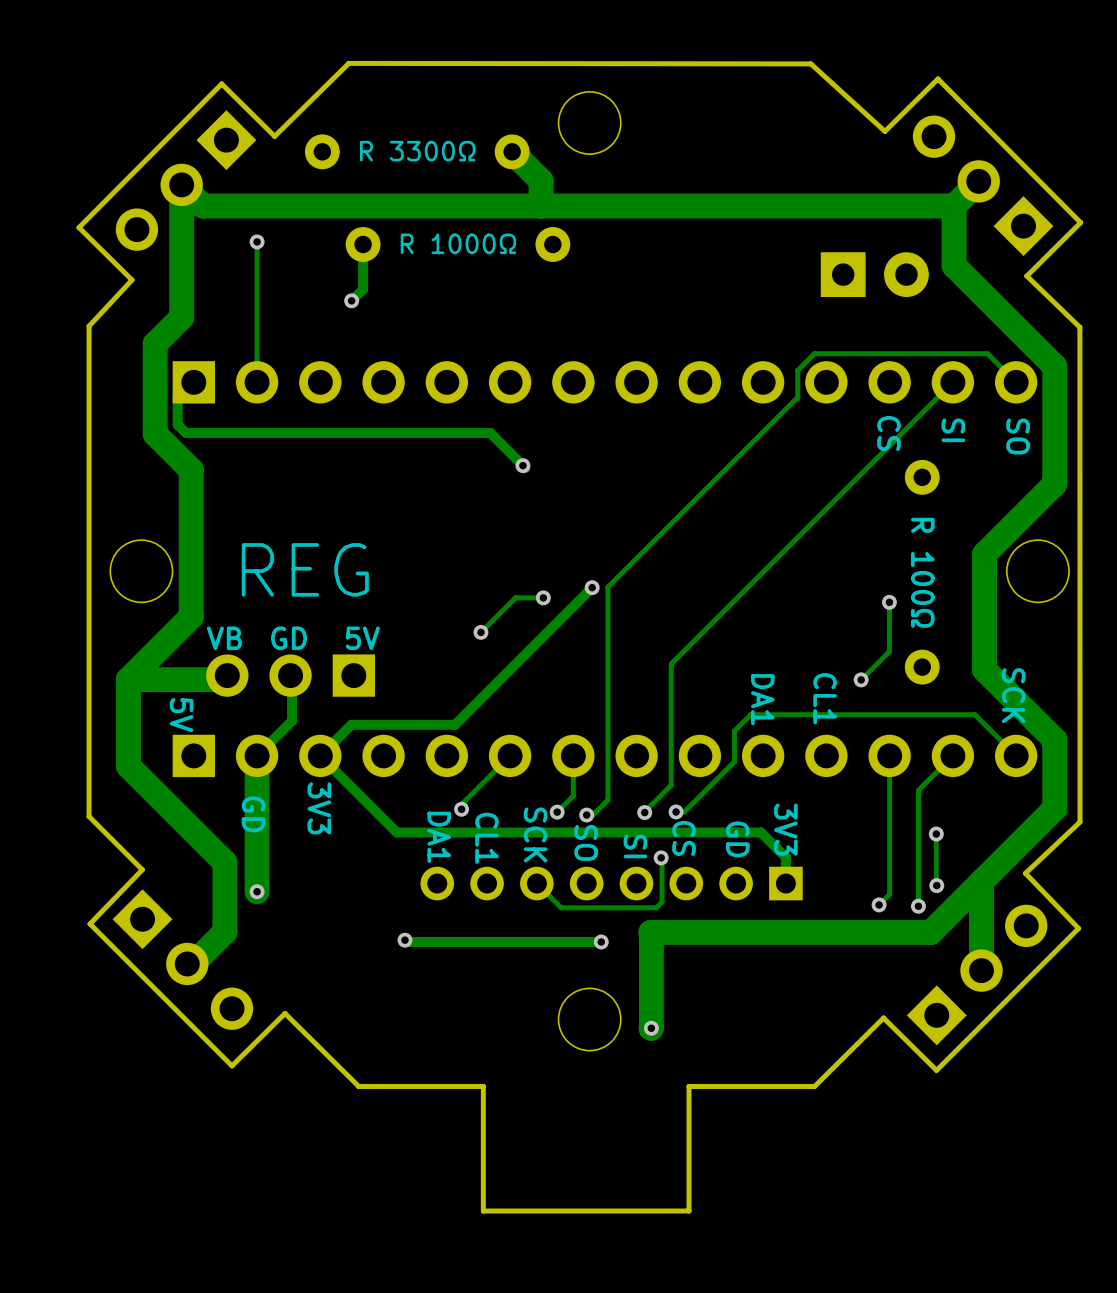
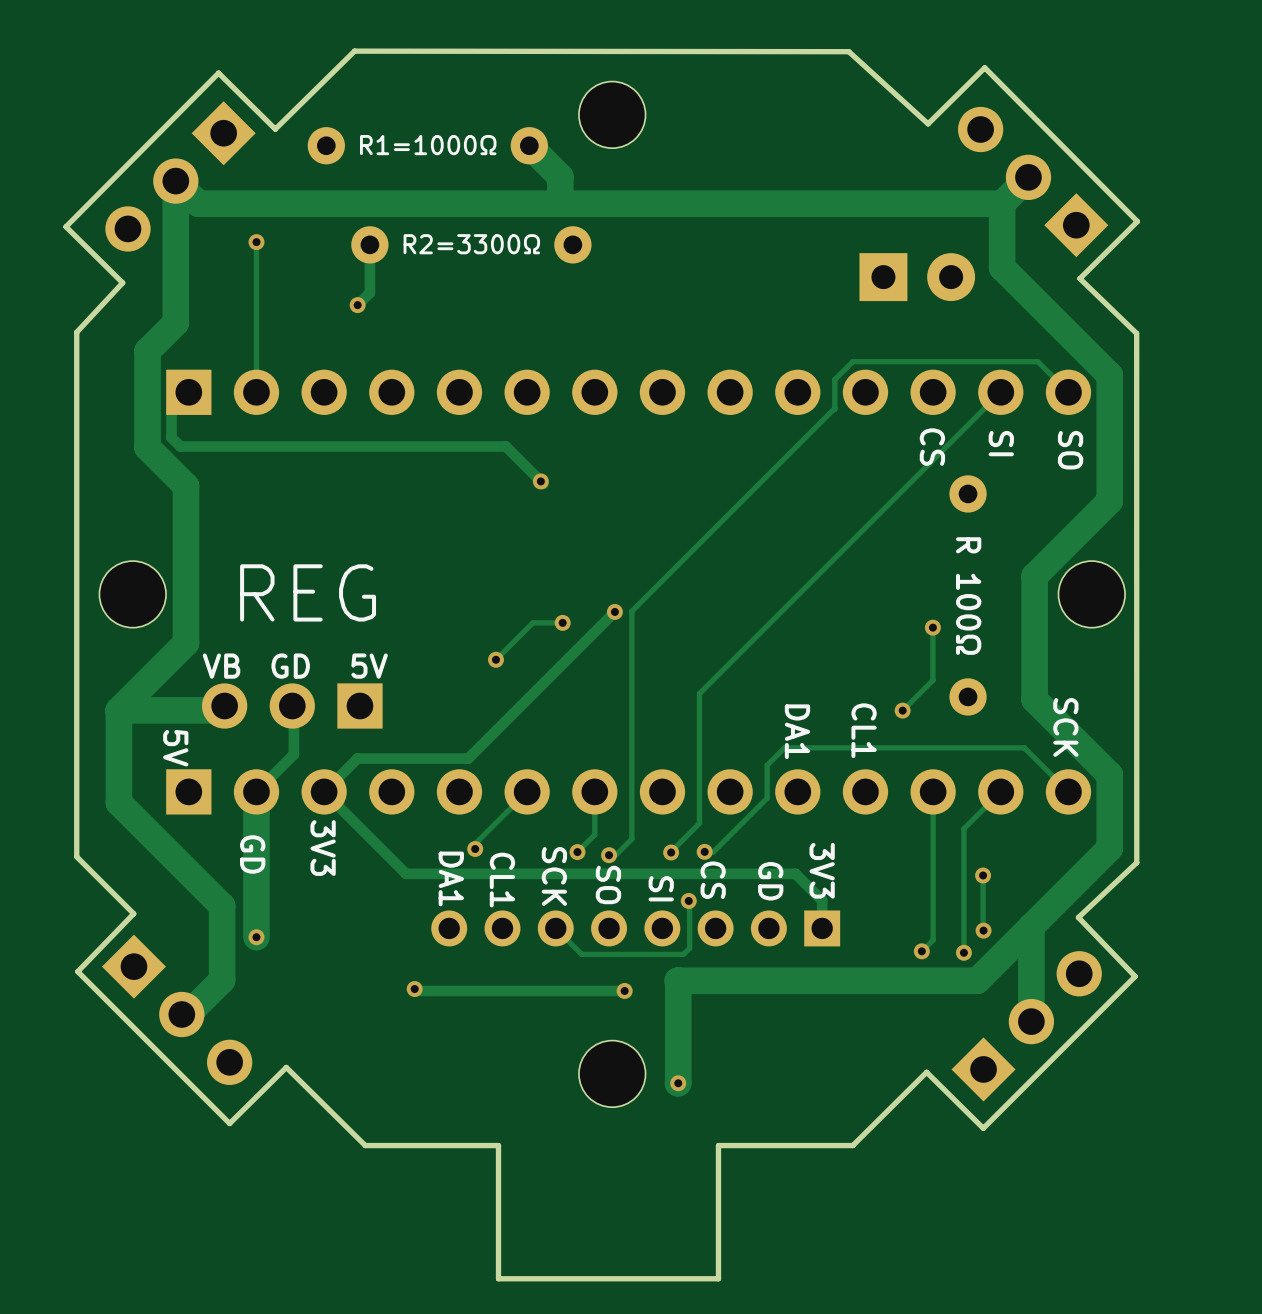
part text: R 3300Ω (417, 151) -> R1=1000Ω (428, 145)
part text: R 1000Ω (458, 243) -> R2=3300Ω (471, 244)

